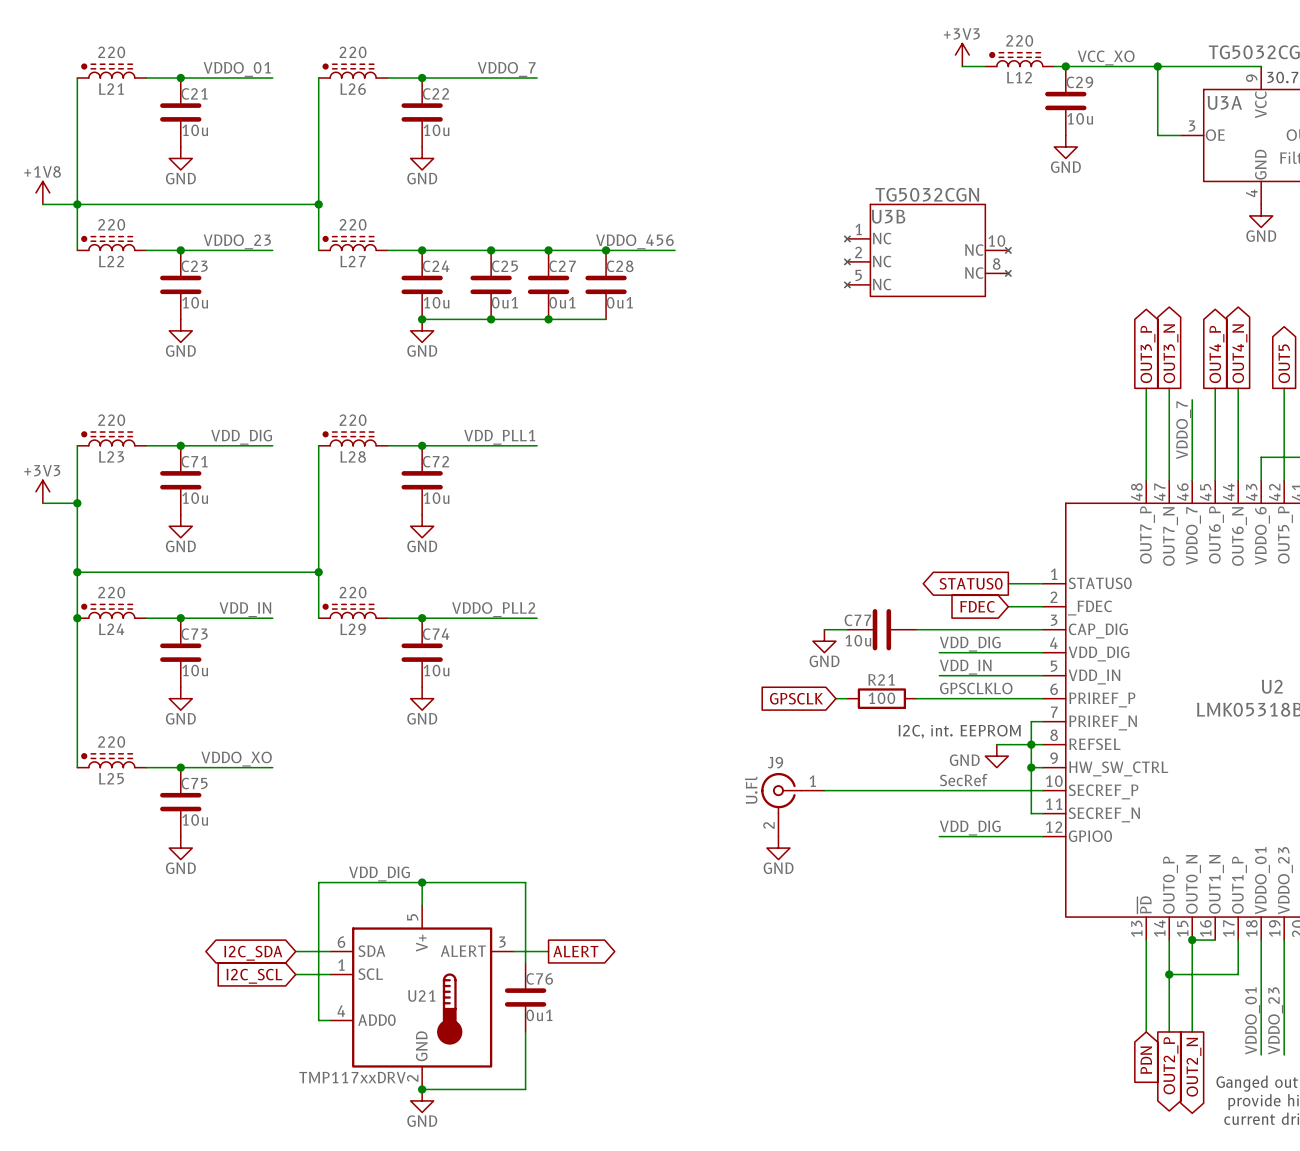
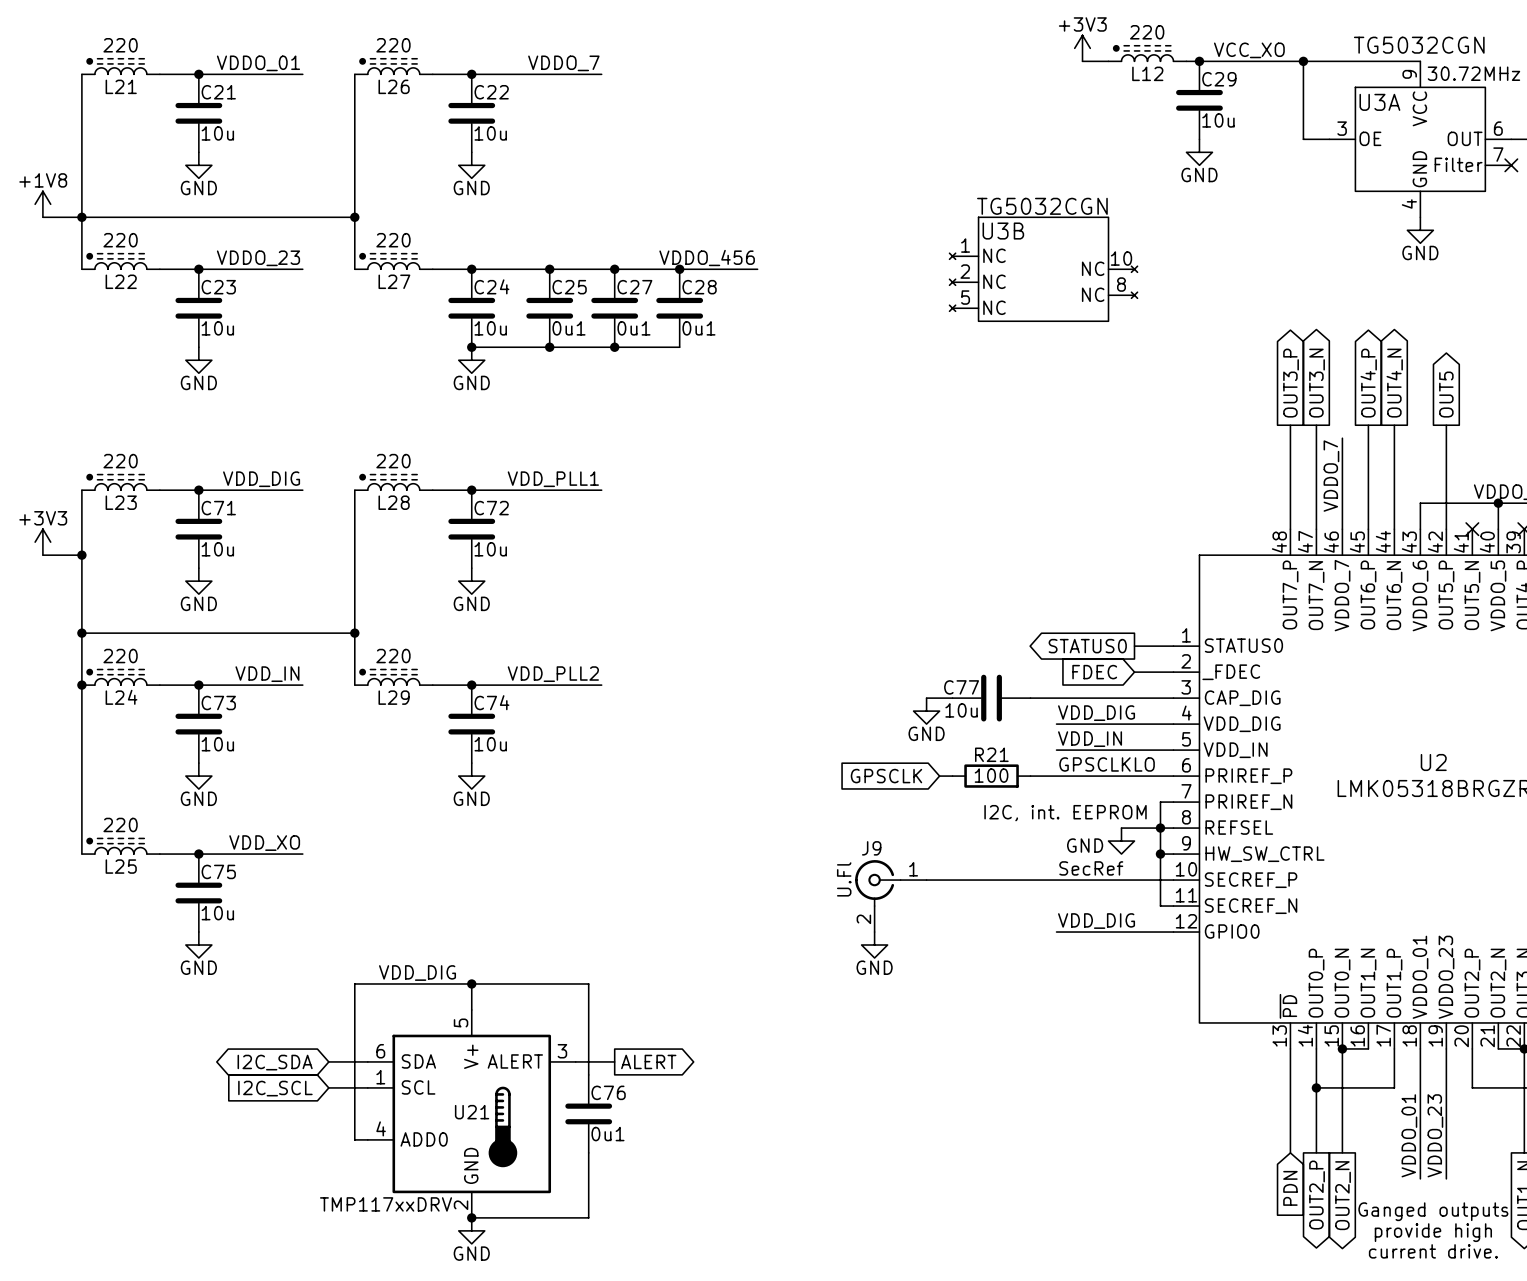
label: VDDO_PLL2 (493, 609) -> VDD_PLL2 (553, 674)
label: VDDO_XO (236, 759) -> VDD_XO (264, 843)

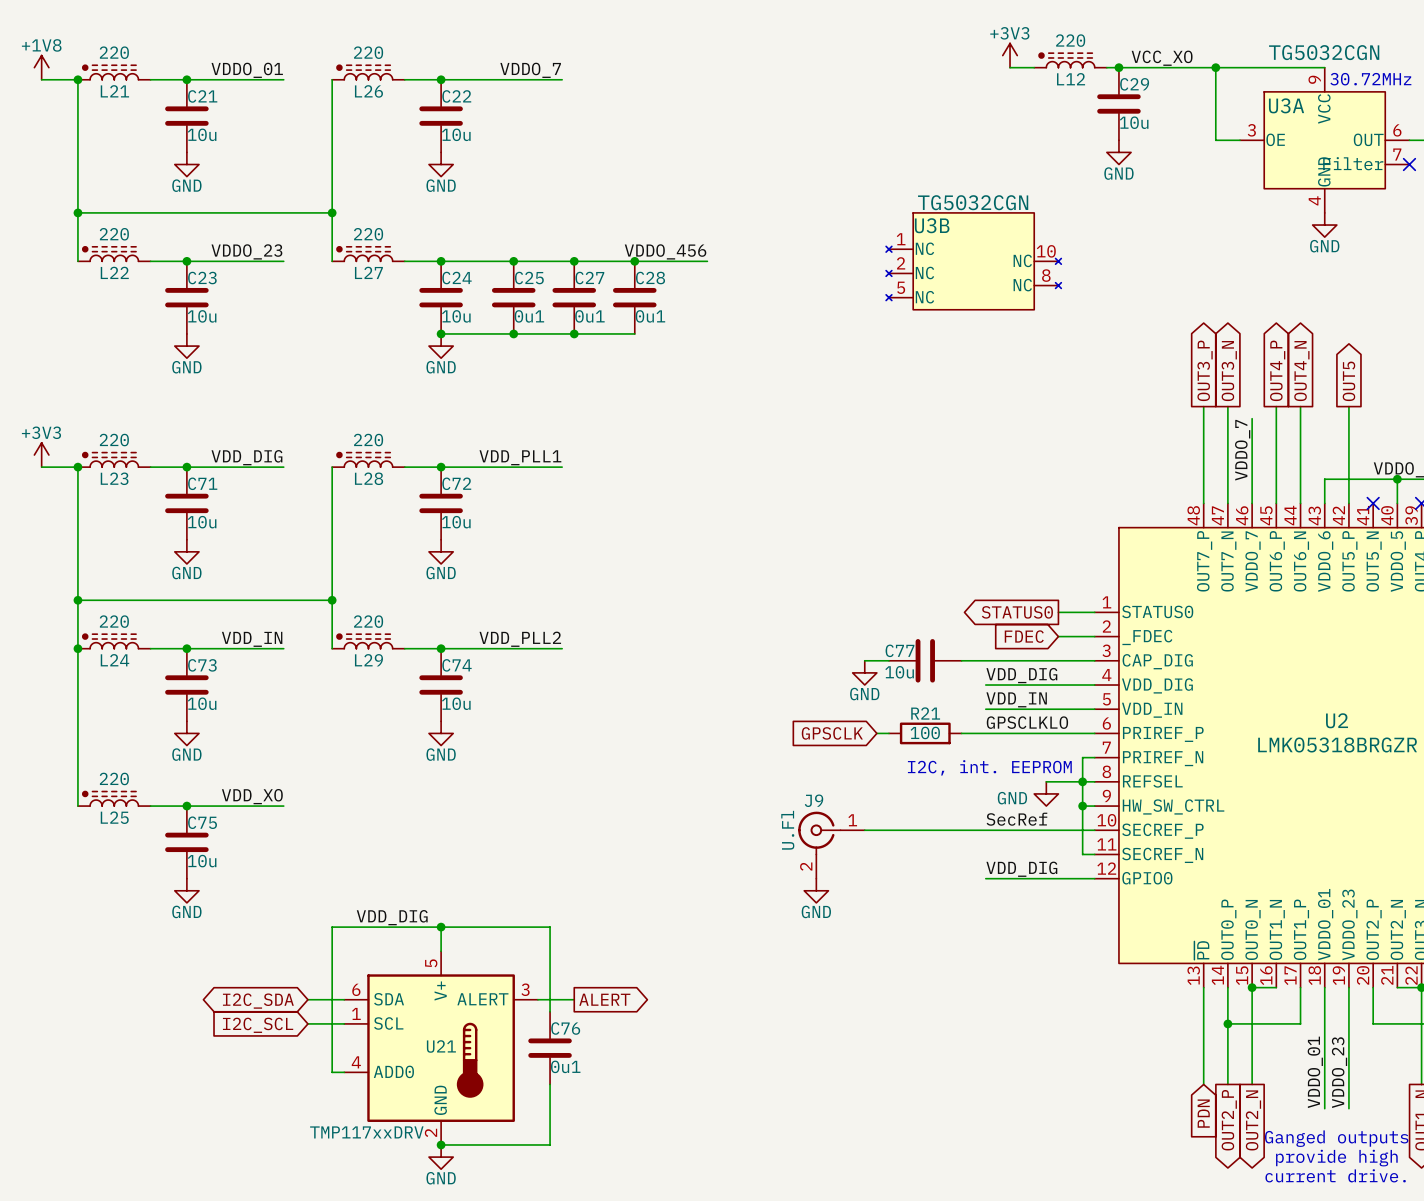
junction: none -> (77, 79)
power symbol position: +1V8 (42, 204) -> +1V8 (41, 67)
wire: (42, 217) (81, 217) -> (41, 79) (77, 79)
junction: none -> (77, 467)
power symbol position: +3V3 (42, 542) -> +3V3 (41, 455)
wire: (42, 555) (81, 555) -> (41, 467) (77, 467)
junction: (81, 555) -> none

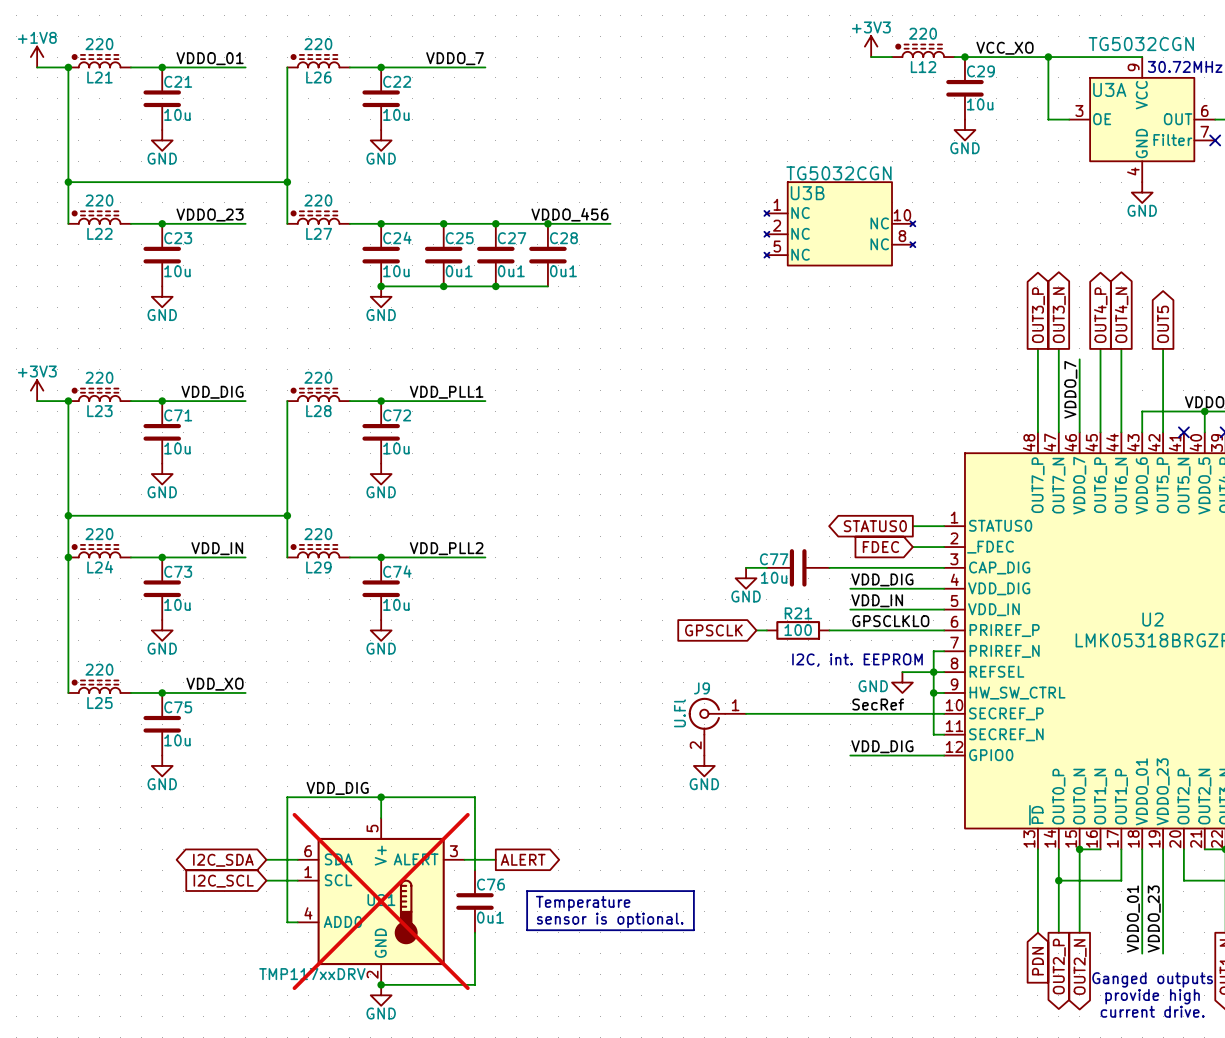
line: none -> (527, 891) (693, 891) (693, 930) (527, 930) (527, 891)
U21 do-not-place cross: none -> (381, 901)
text: none -> Temperature (583, 903)
text: none -> sensor is optional. (610, 920)

